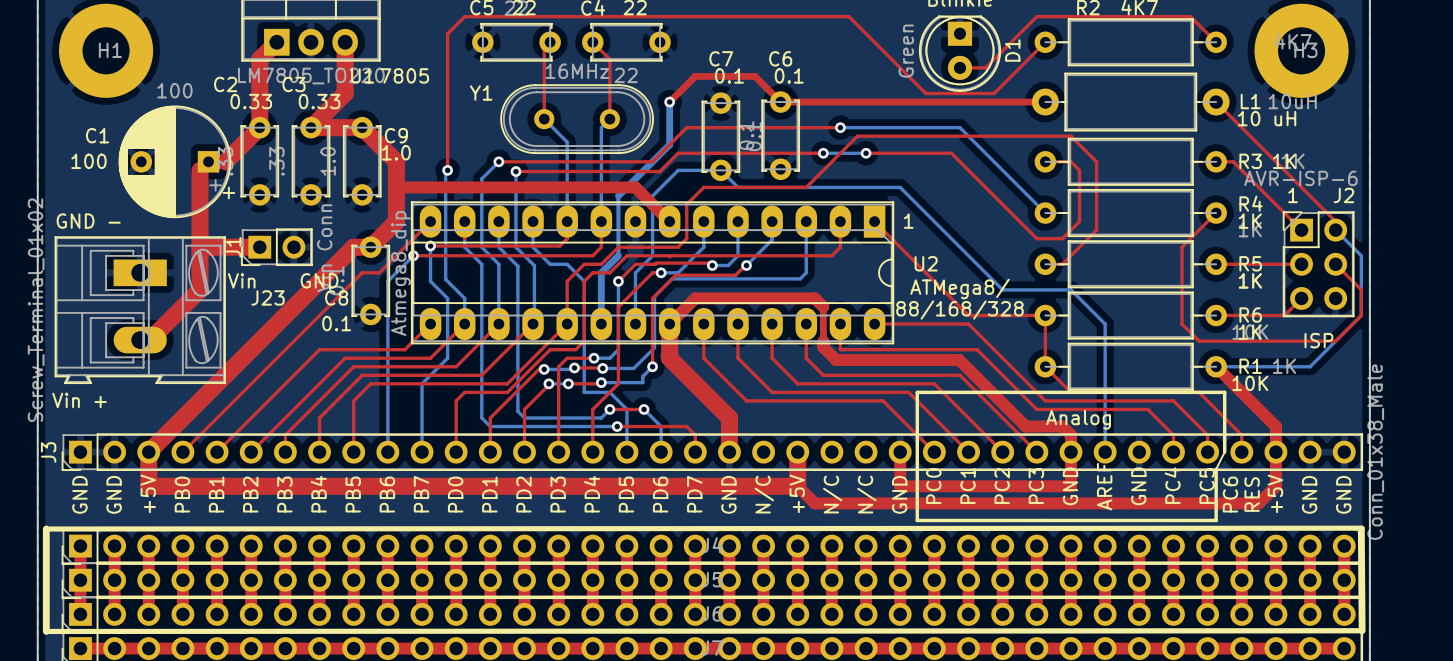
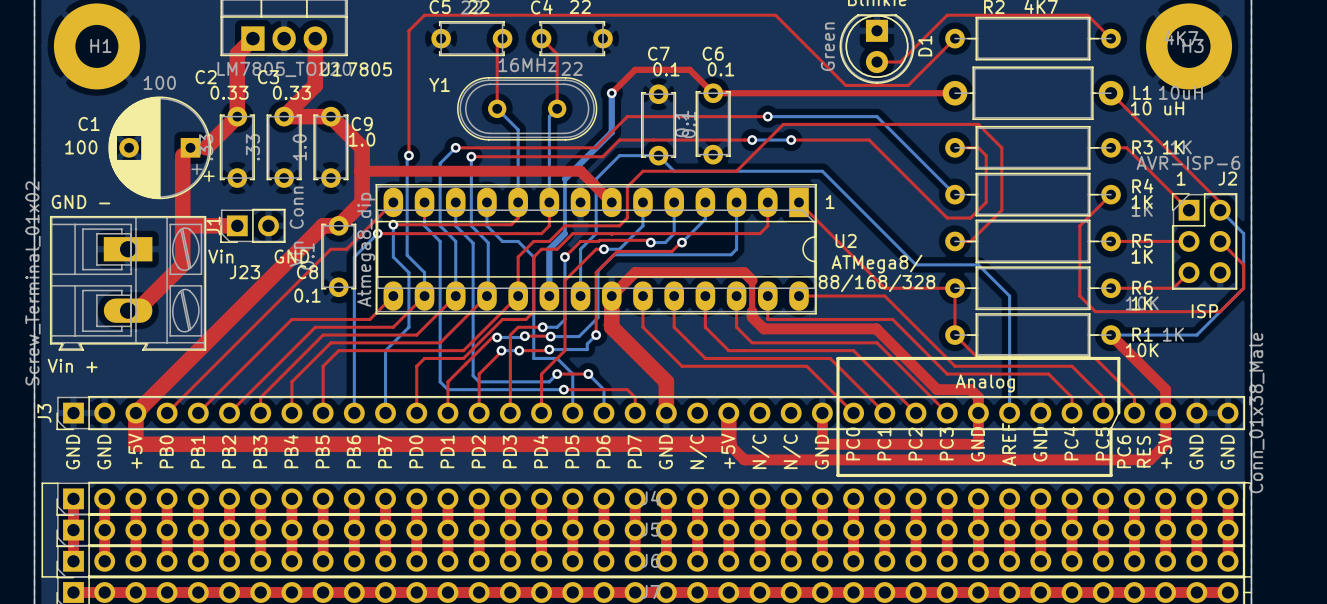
line: (1362, 528) (46, 529) (46, 631) (1362, 630) (1361, 529) -> (1244, 482) (1251, 483)
line: none -> (1243, 576) (1251, 576)
line: none -> (1243, 592) (1251, 592)

